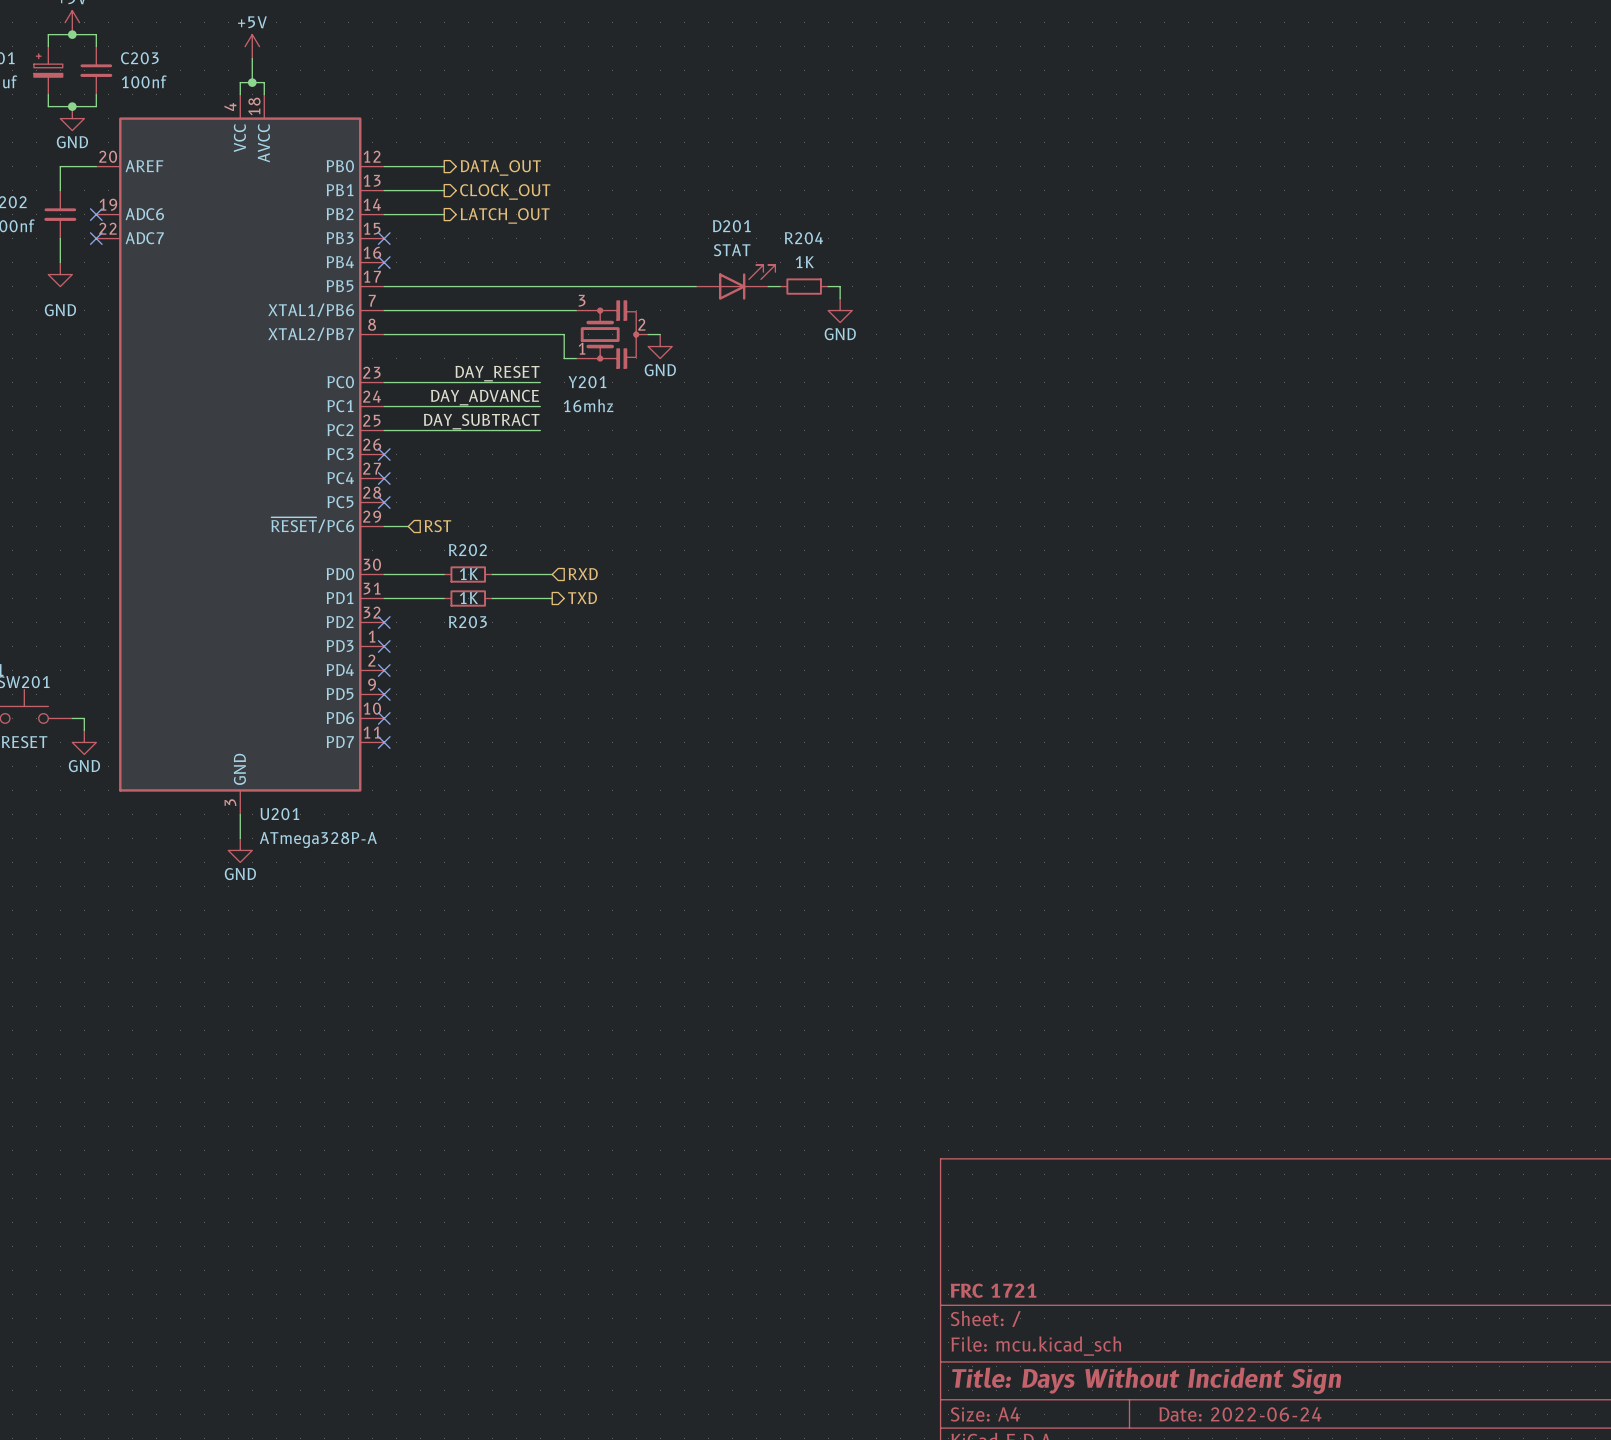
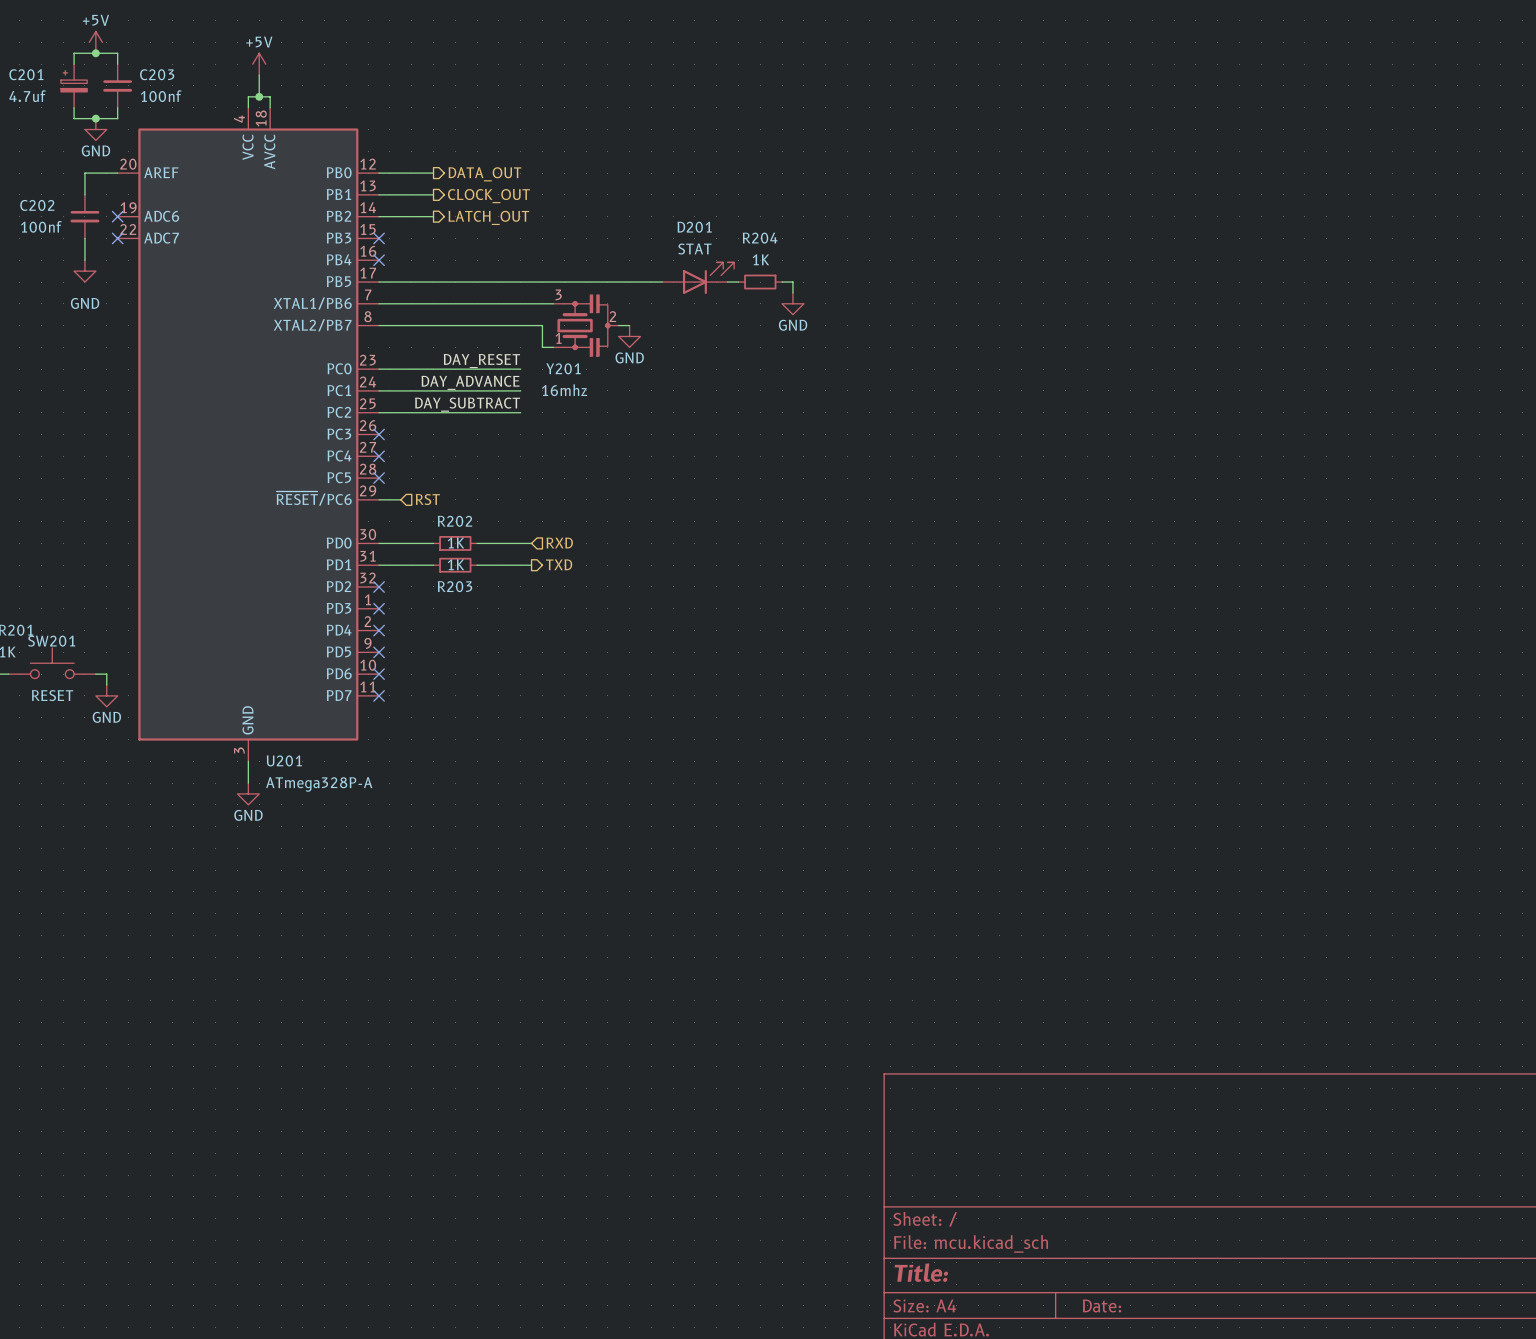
title block: FRC 1721 (993, 1290) -> none
title block: Title: Days Without Incident Sign (1146, 1380) -> Title: (921, 1272)
title block: Date: 2022-06-24 (1240, 1414) -> Date: (1101, 1306)

